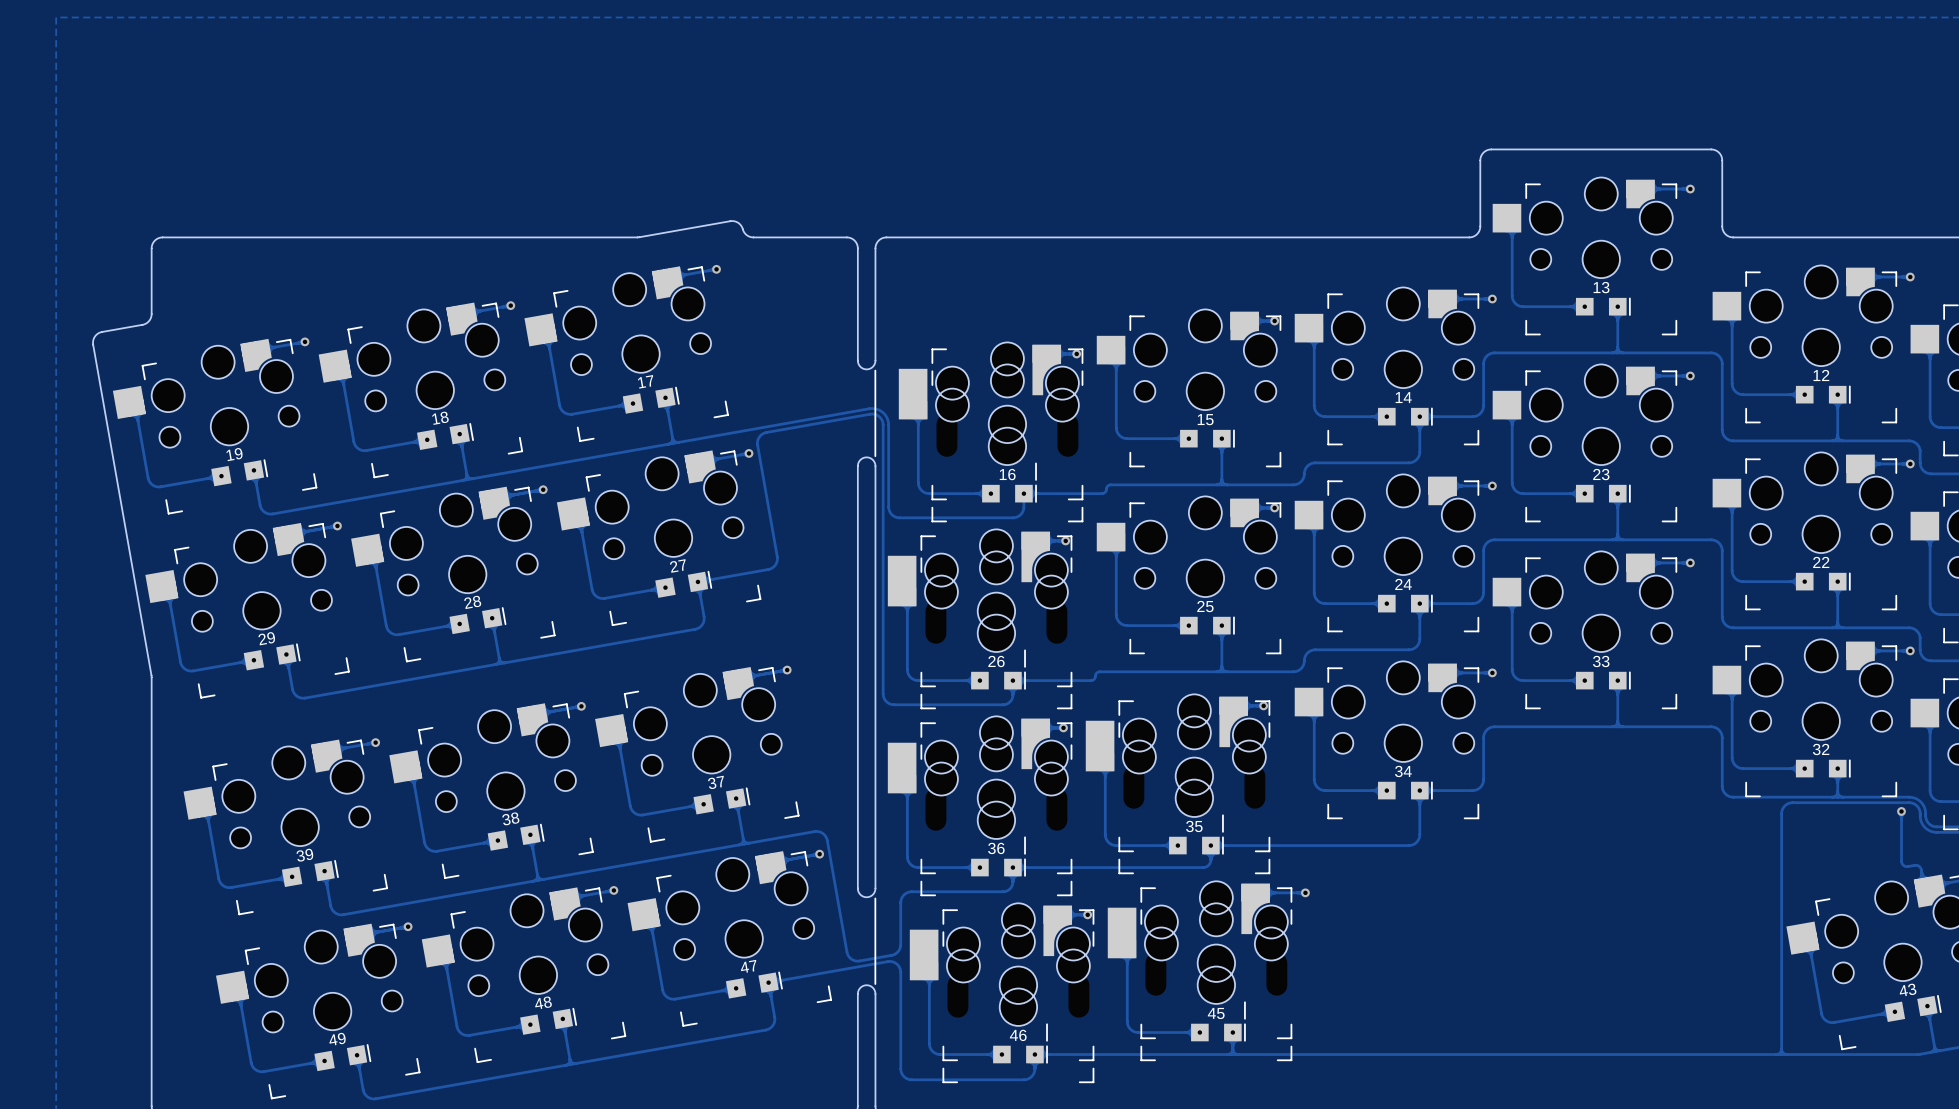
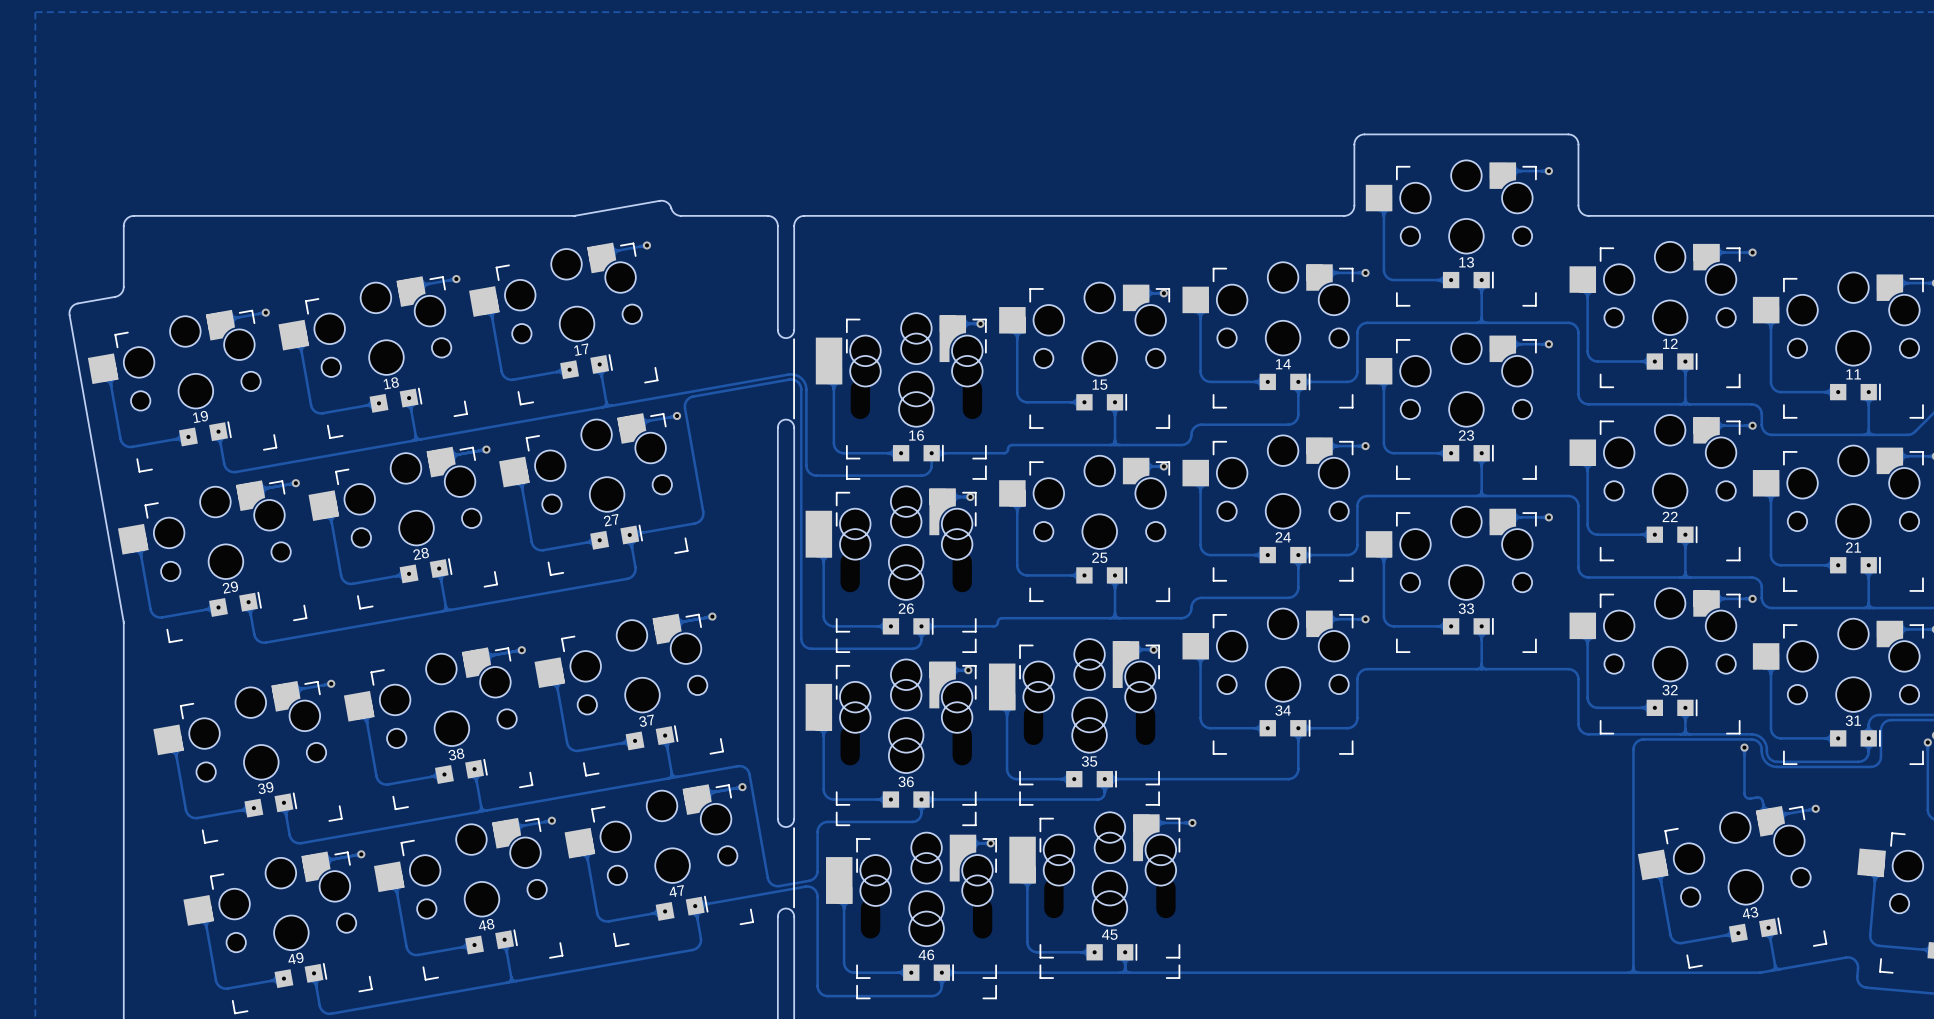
part footprint: [898, 342, 1084, 523] -> [815, 313, 987, 480]
part footprint: [887, 529, 1073, 710] -> [805, 486, 977, 653]
part footprint: [1085, 694, 1271, 875] -> [988, 639, 1160, 806]
part footprint: [887, 716, 1073, 897] -> [805, 659, 977, 827]
part footprint: [1107, 881, 1293, 1062] -> [1009, 812, 1181, 979]
part footprint: [909, 903, 1095, 1084] -> [825, 832, 997, 1000]

